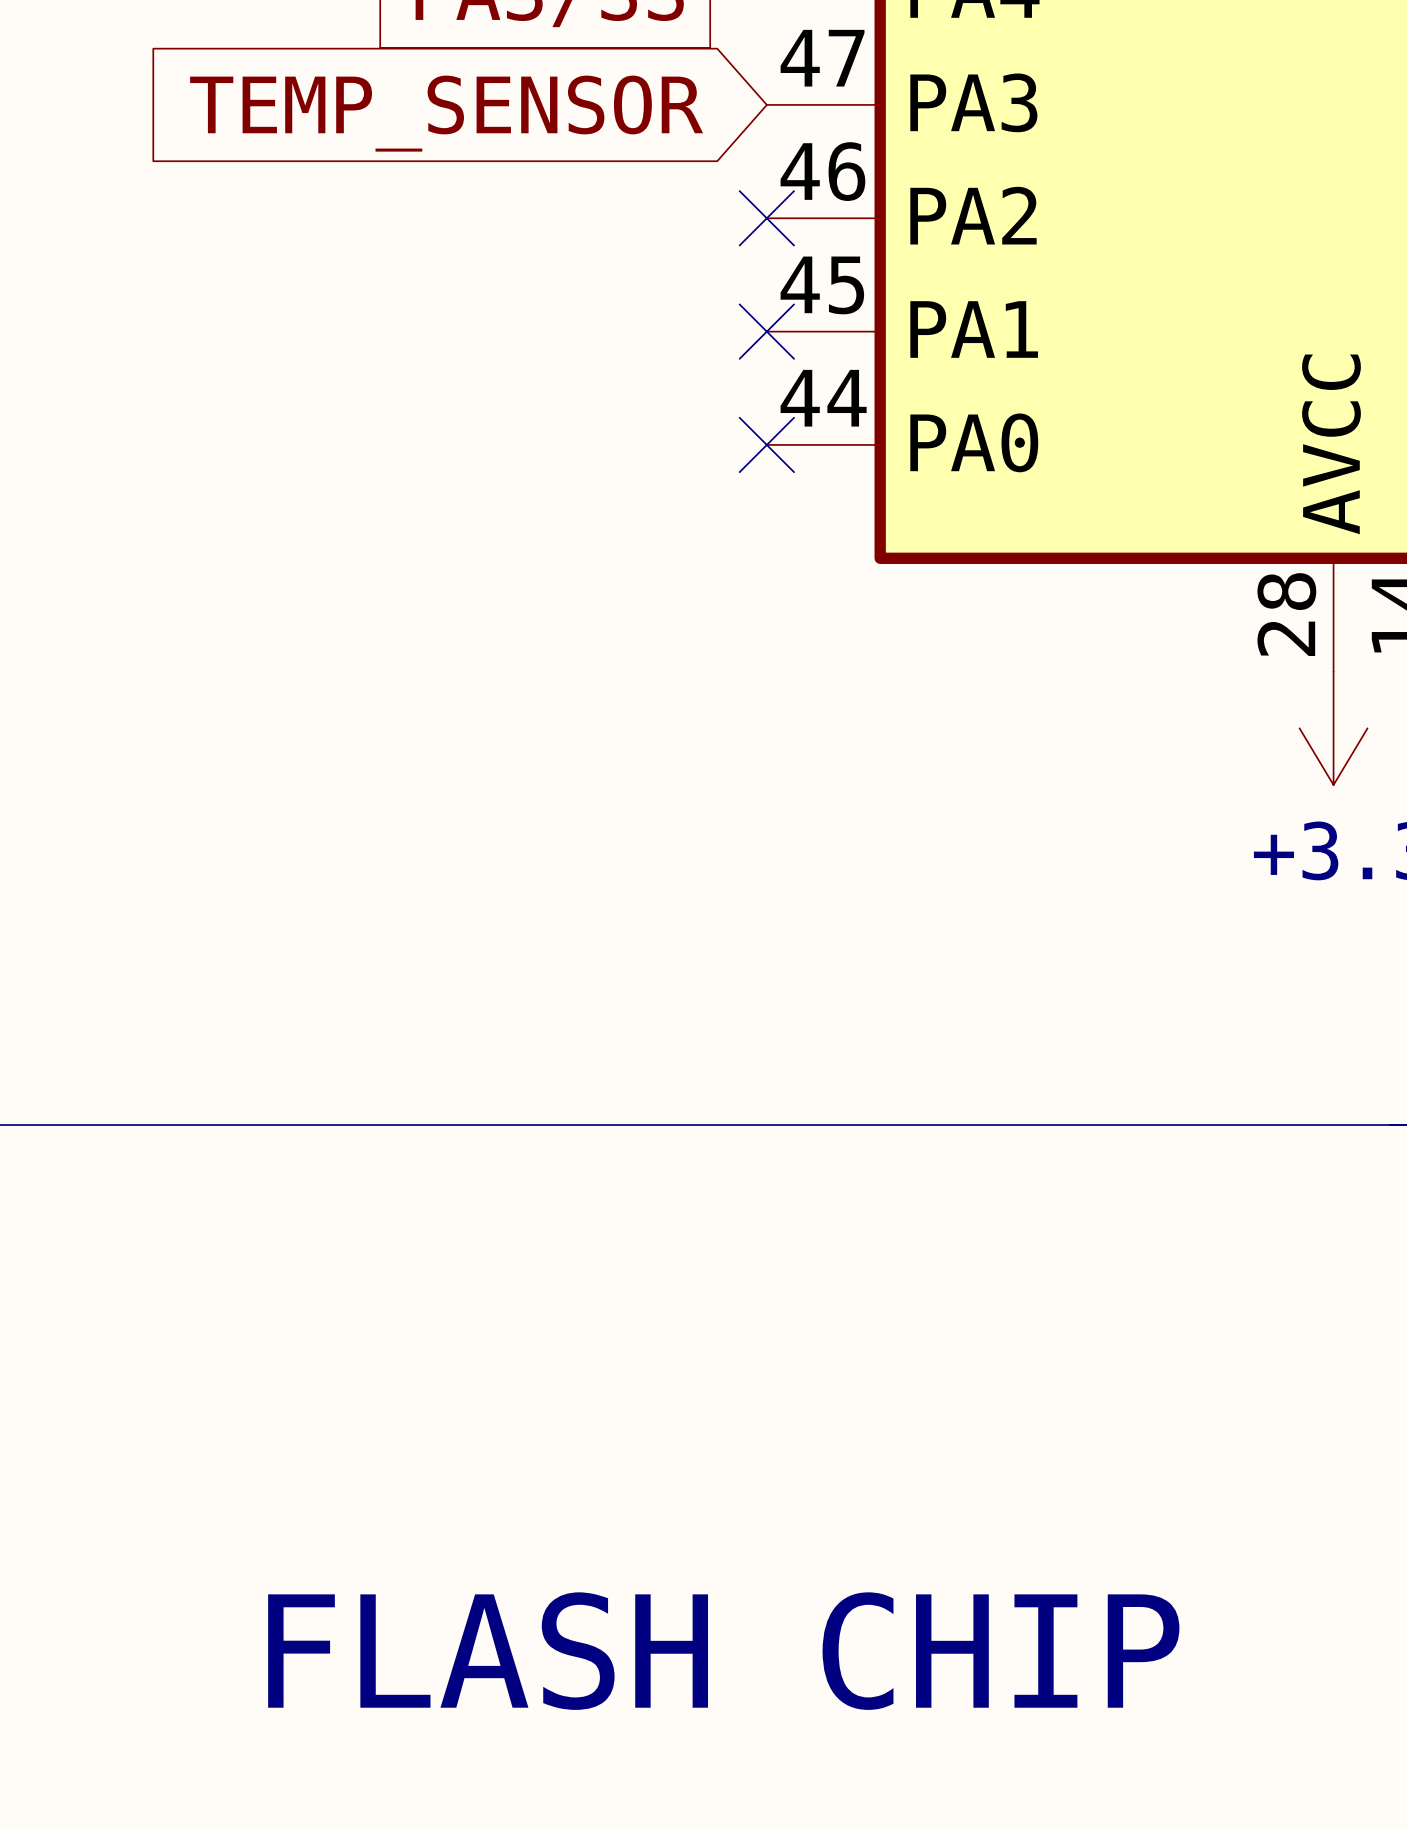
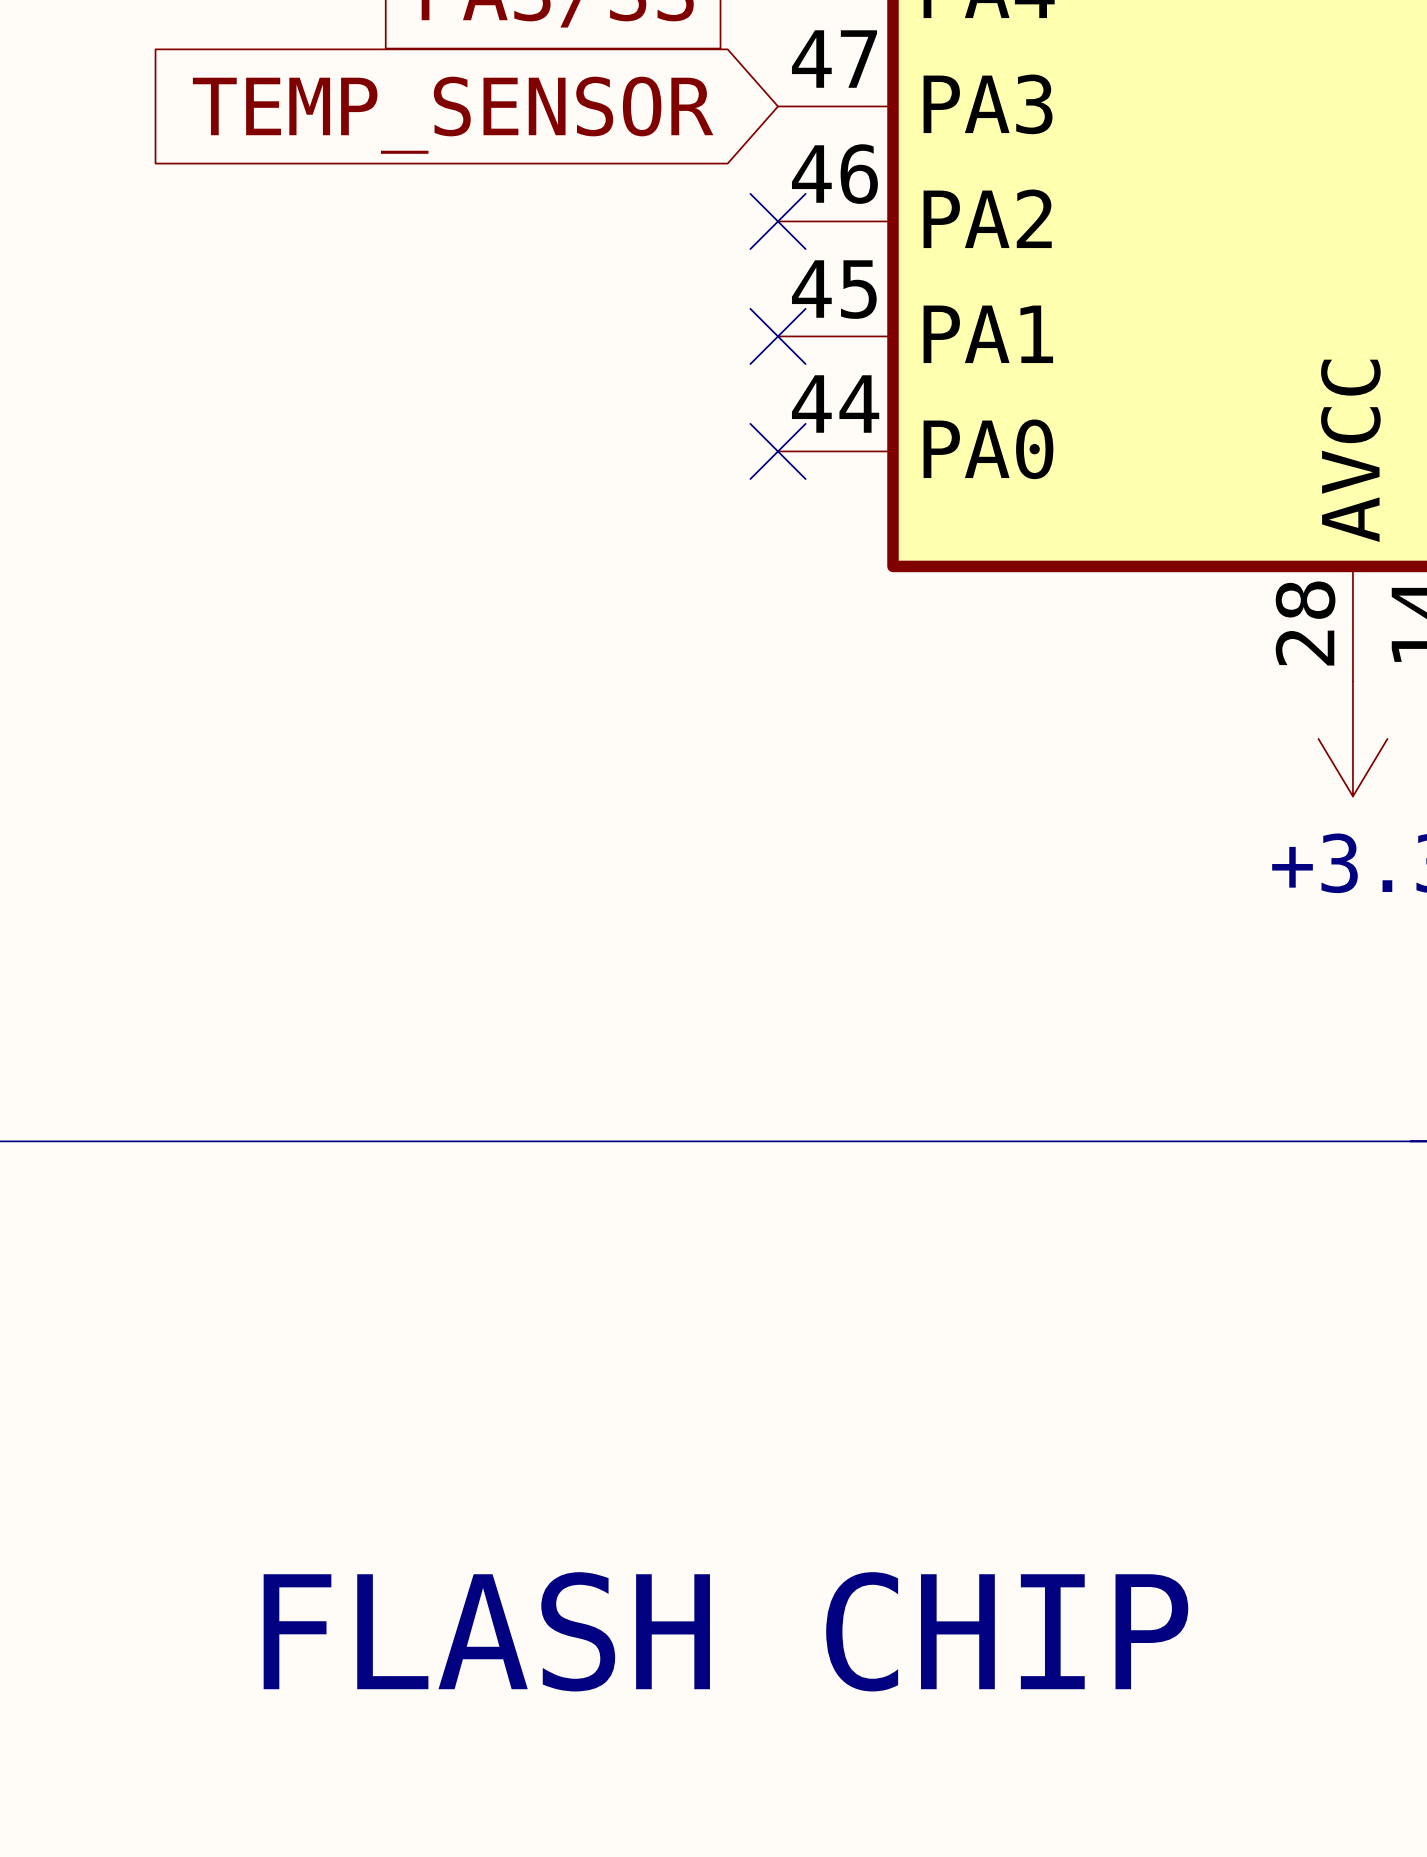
text position: FLASH CHIP (723, 1651) -> FLASH CHIP (725, 1631)

